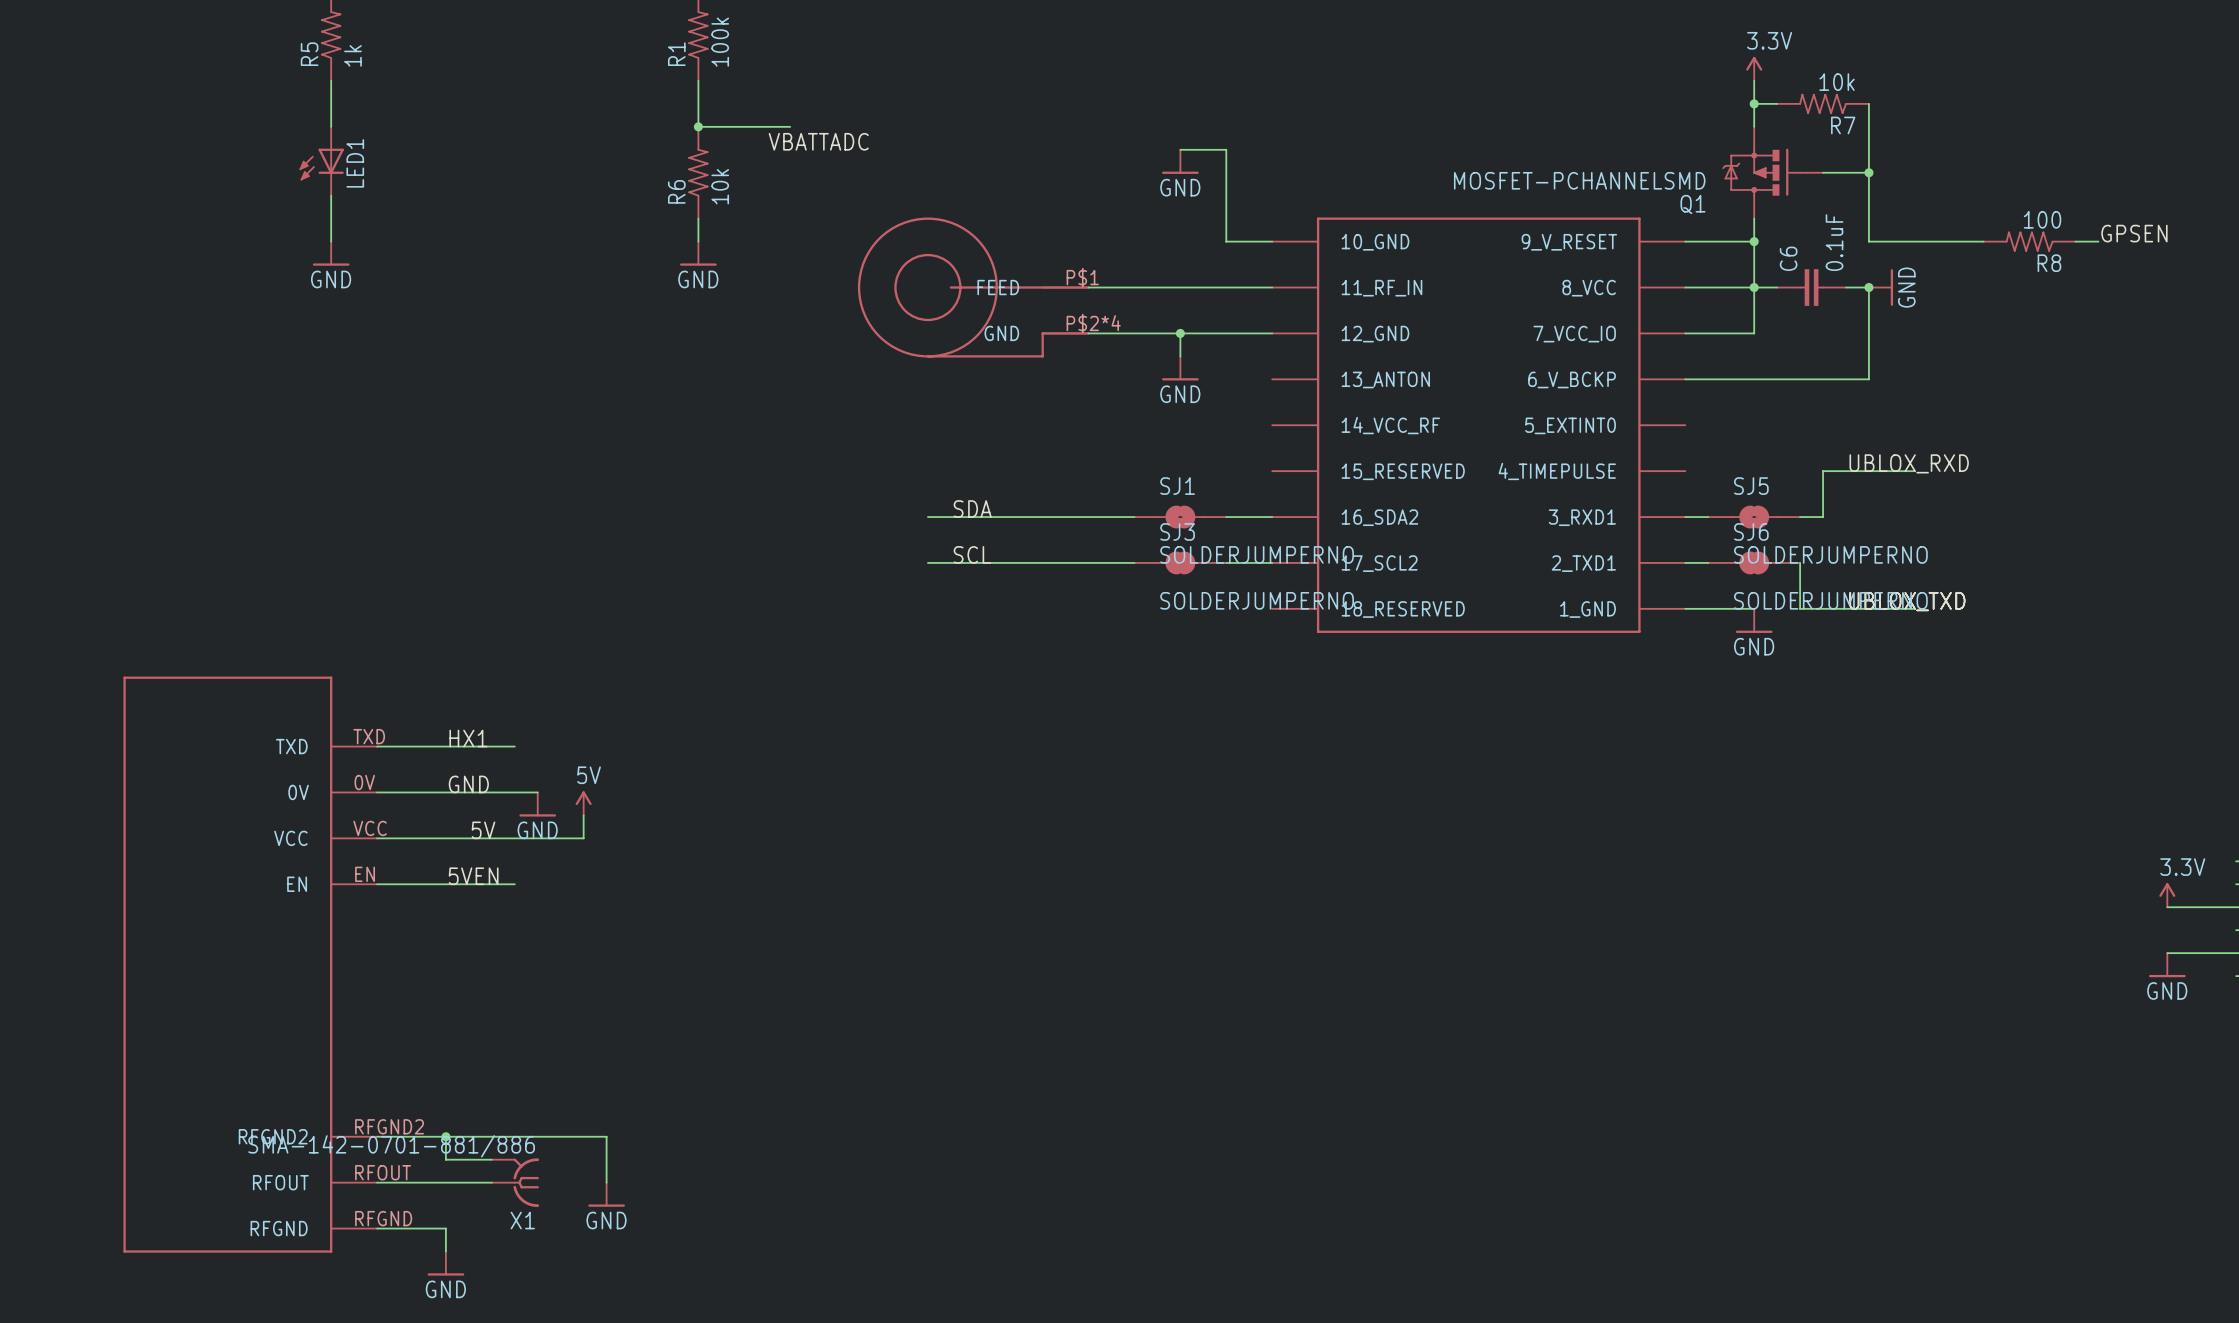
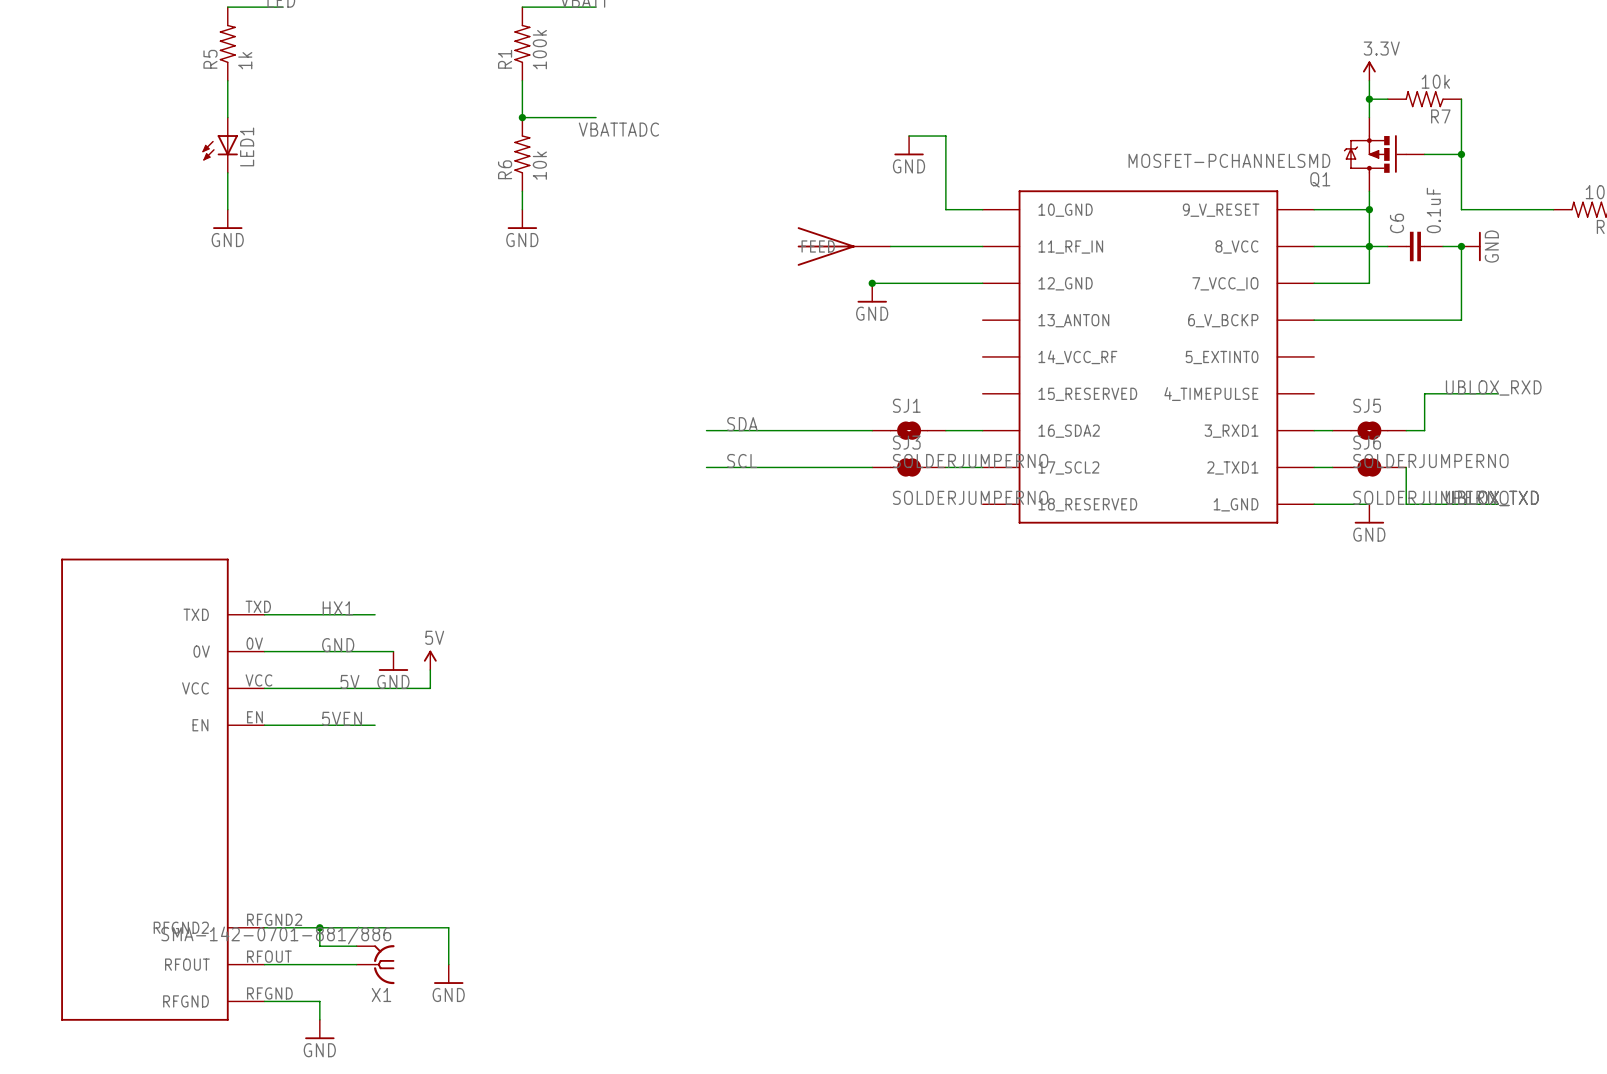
part: (973, 287) -> none
part: none -> (844, 246)
wire: (1088, 333) (1134, 333) -> none
wire: (1180, 333) (1180, 356) -> none
junction position: (1180, 333) -> (872, 283)
power symbol position: GND (1180, 368) -> GND (872, 292)

